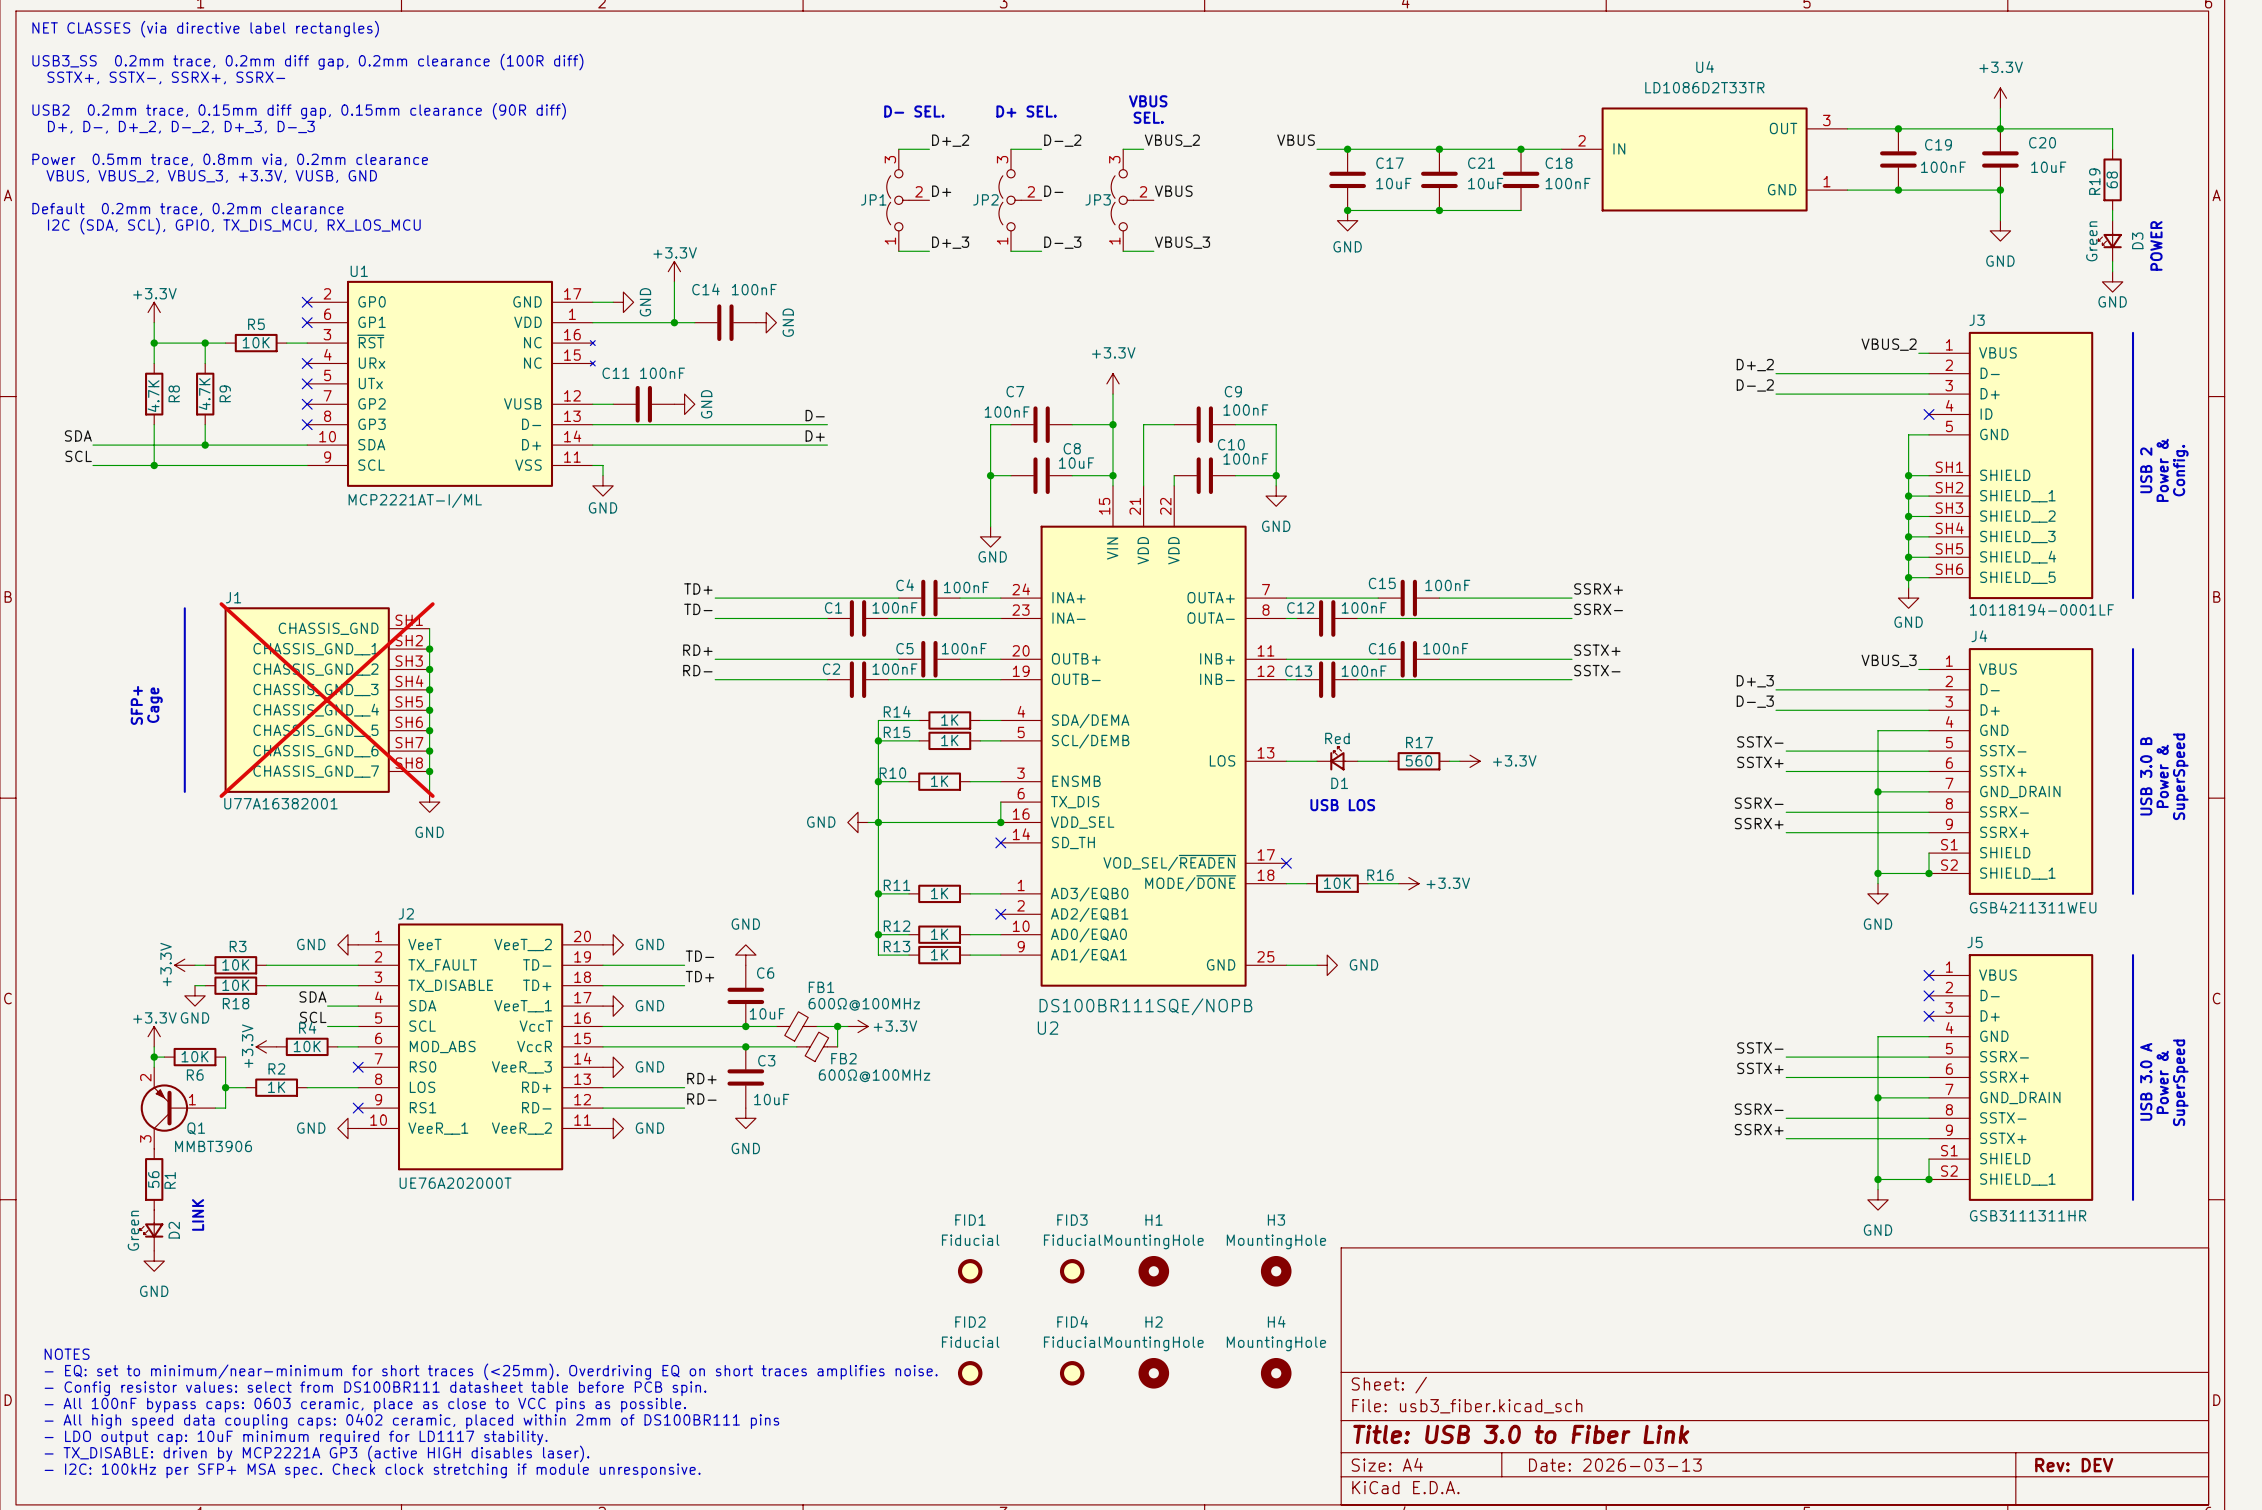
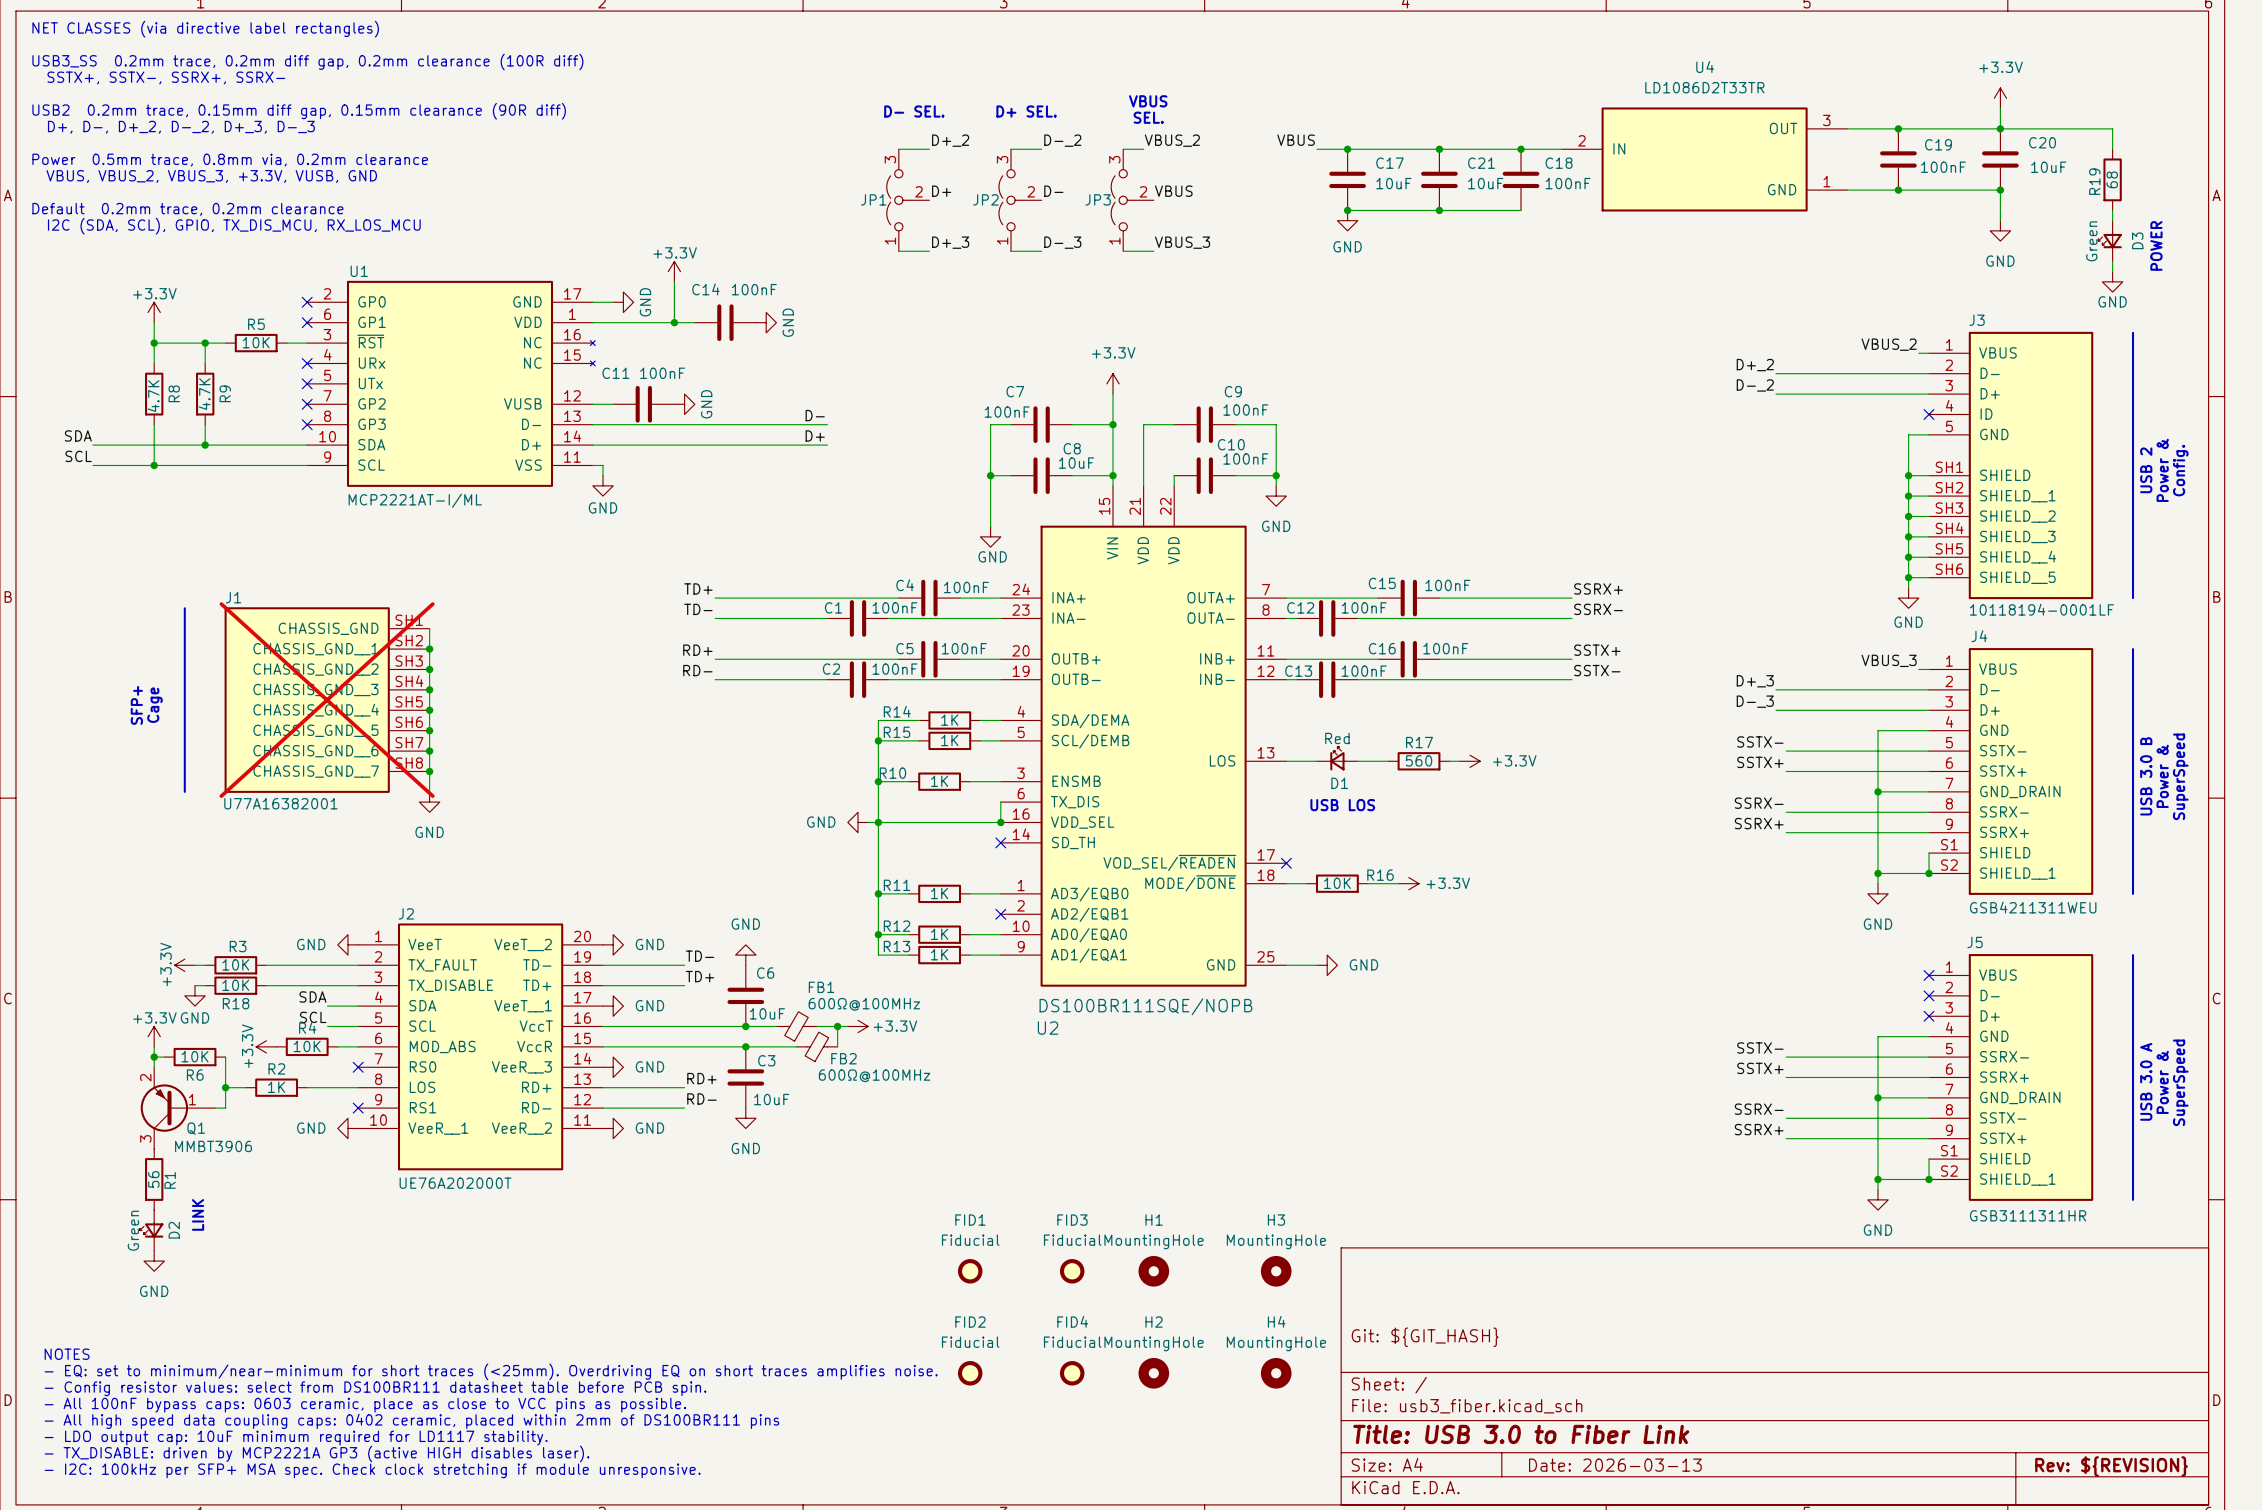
title block: none -> Git: ${GIT_HASH} (1425, 1337)
title block: Rev: DEV (2074, 1465) -> Rev: ${REVISION} (2111, 1466)

